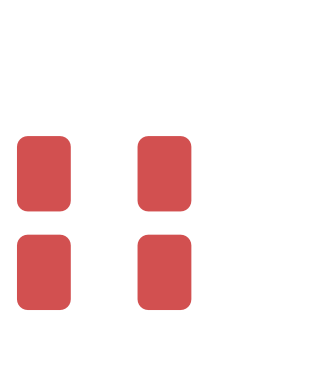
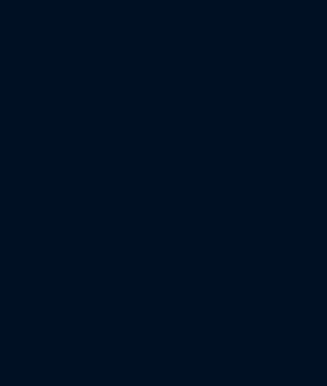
part: (104, 173) -> none
part: (104, 272) -> none

